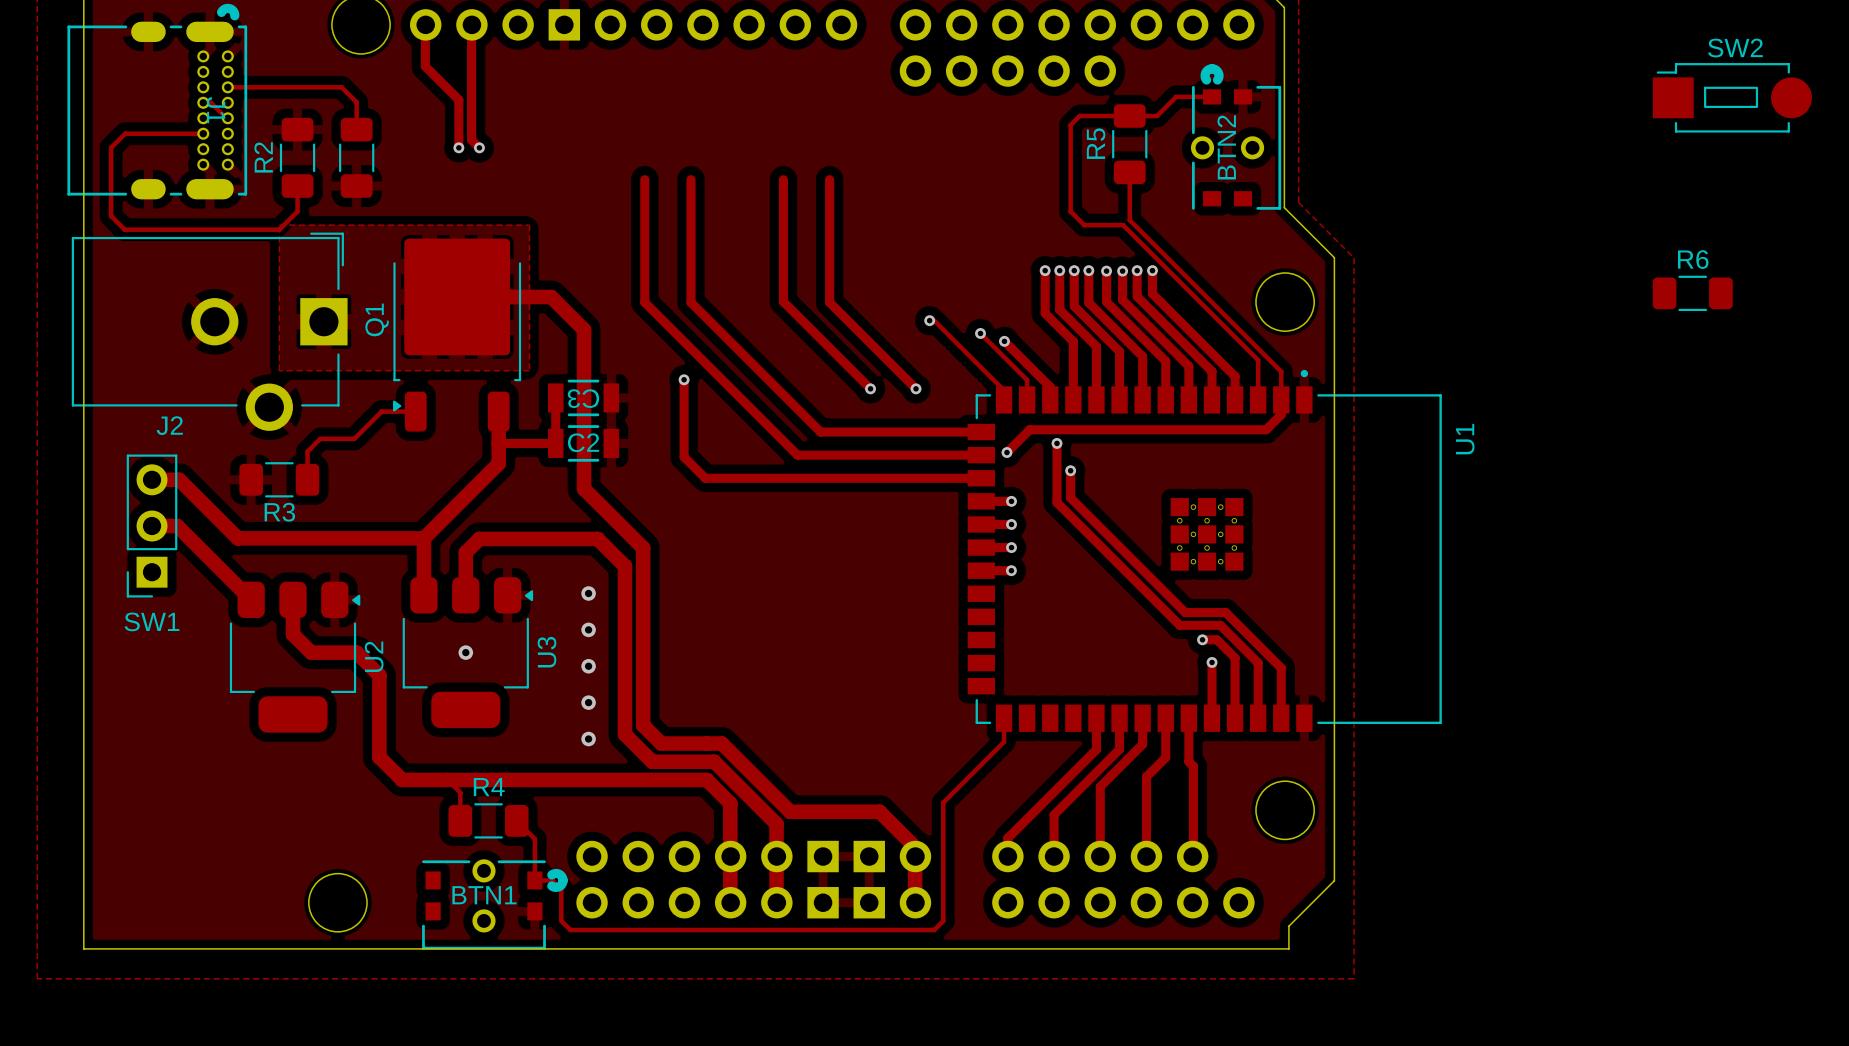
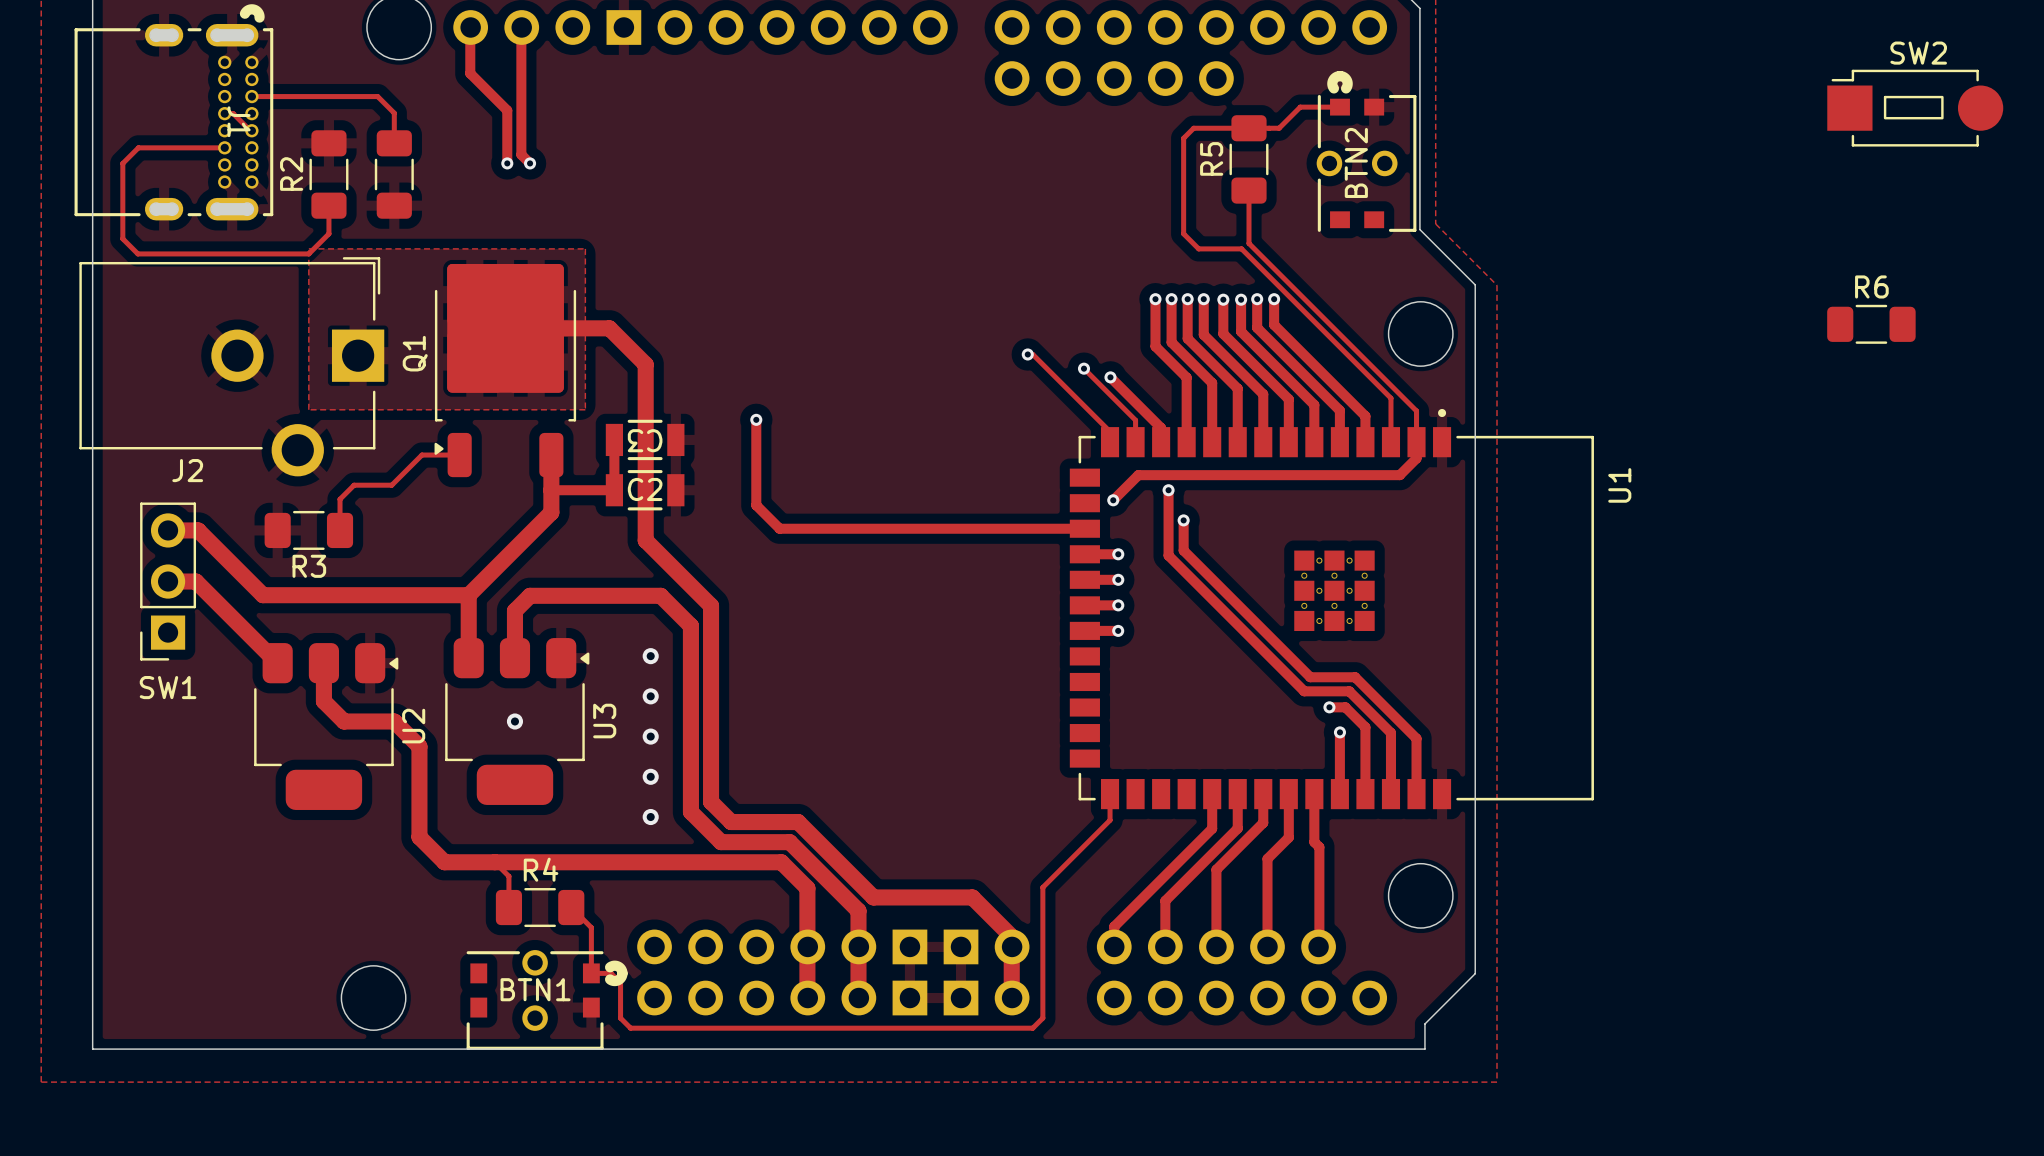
track: (644, 179) (644, 302) (797, 455) (981, 455) -> none
track: (691, 179) (691, 302) (820, 432) (981, 432) -> none
track: (783, 179) (783, 301) (870, 388) -> none
track: (829, 179) (829, 302) (916, 388) -> none
via: (870, 388) -> none
via: (916, 388) -> none

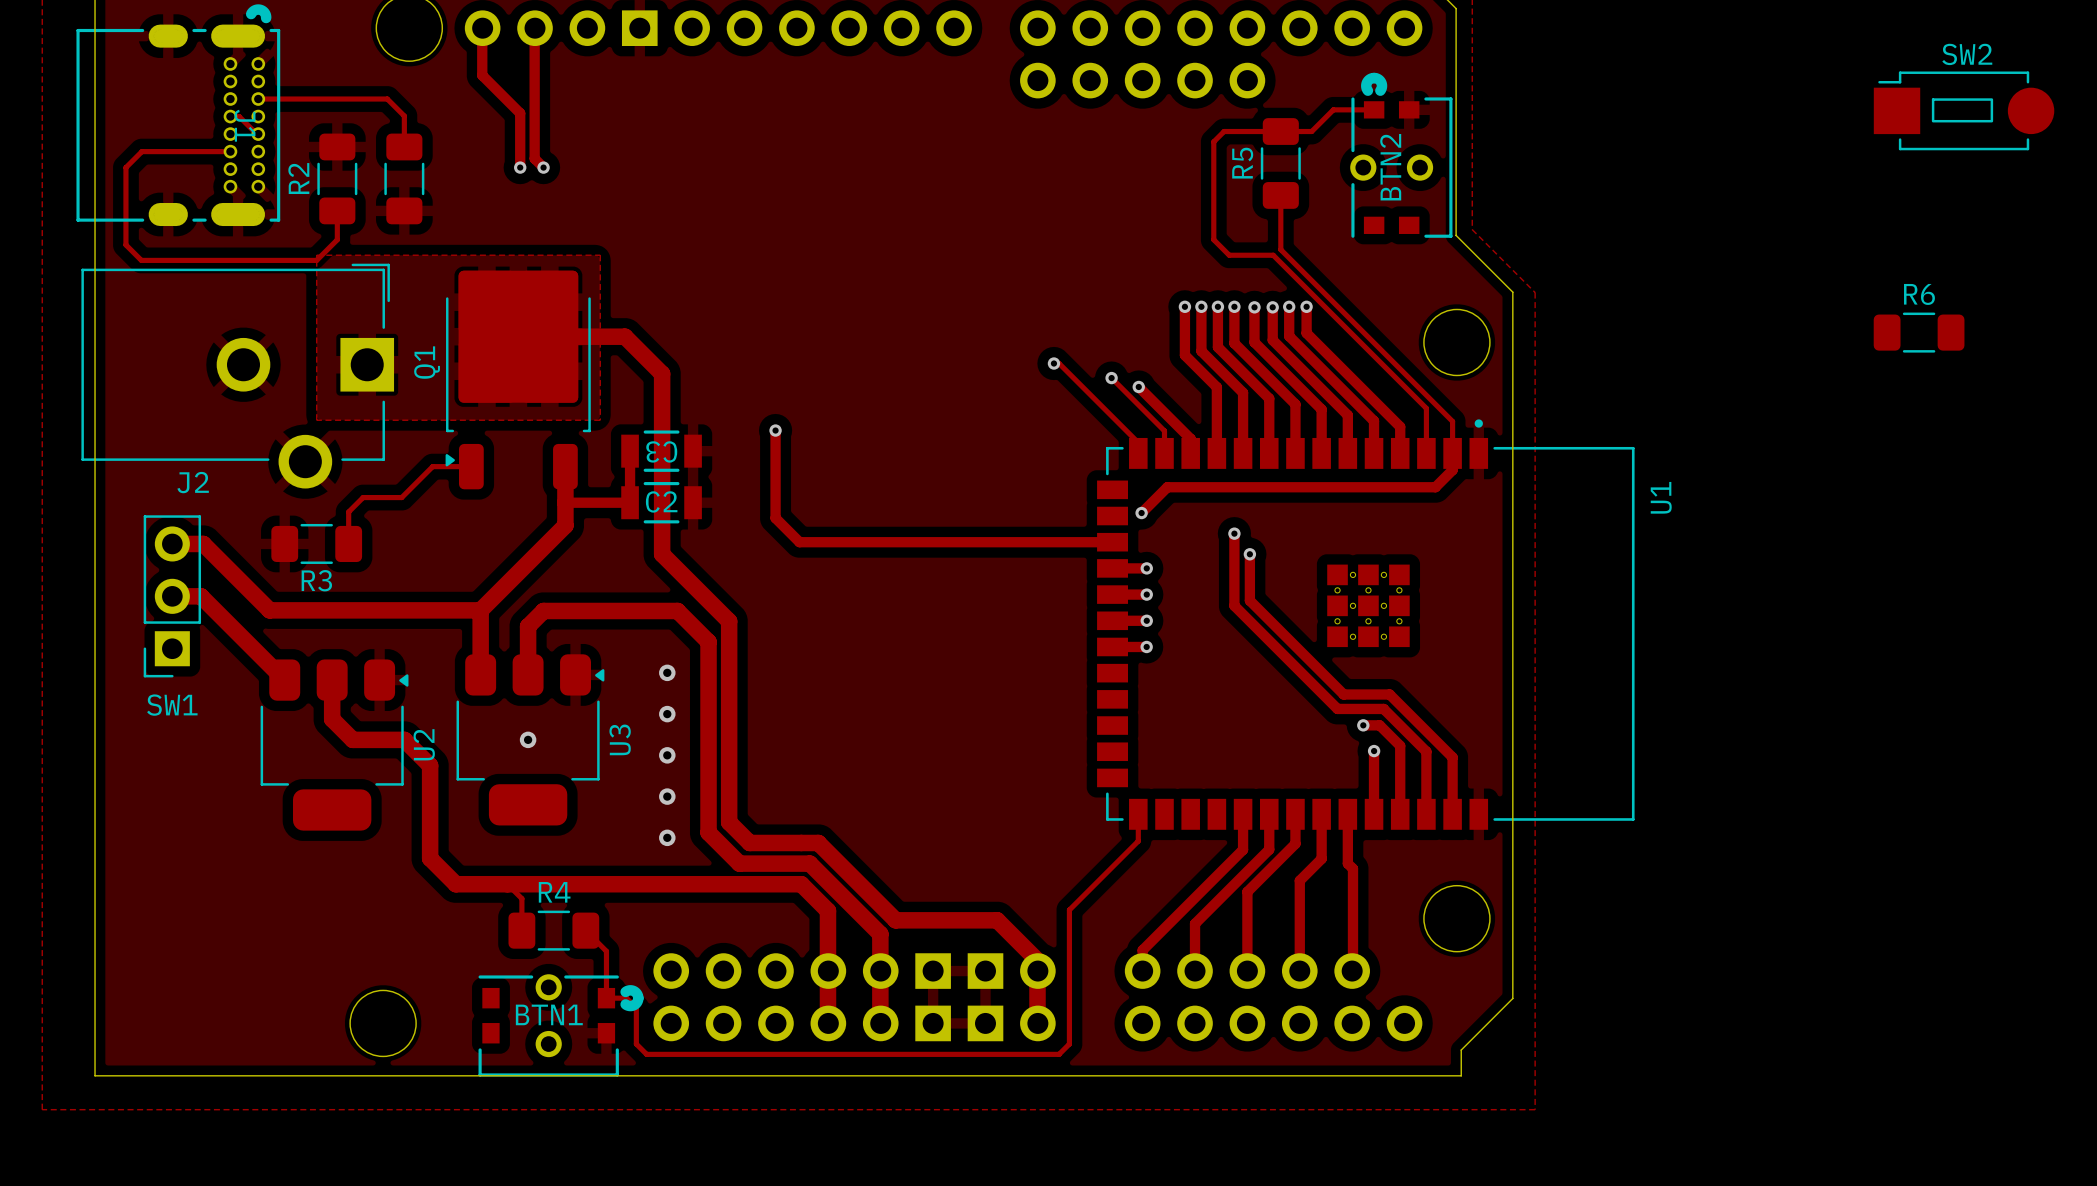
track: (1168, 490) (1168, 555) (1203, 590) -> (1234, 533) (1234, 605)
via: (1168, 490) -> none
track: (1183, 520) (1183, 550) (1218, 585) -> (1249, 554) (1249, 600)
via: (1183, 520) -> none
via: none -> (1234, 533)
via: none -> (1249, 554)

